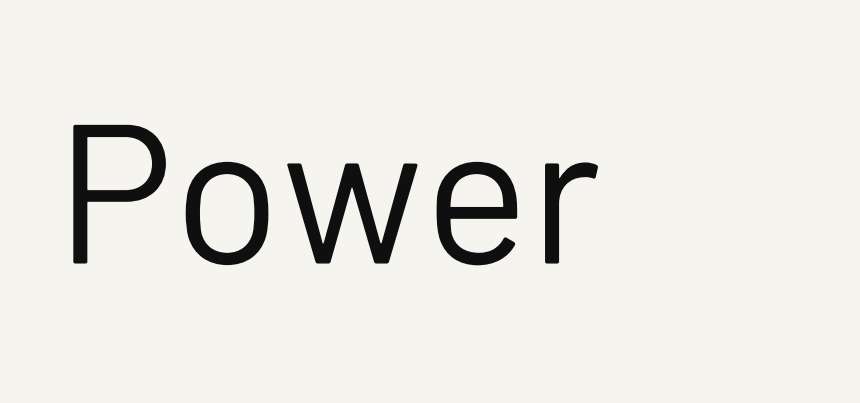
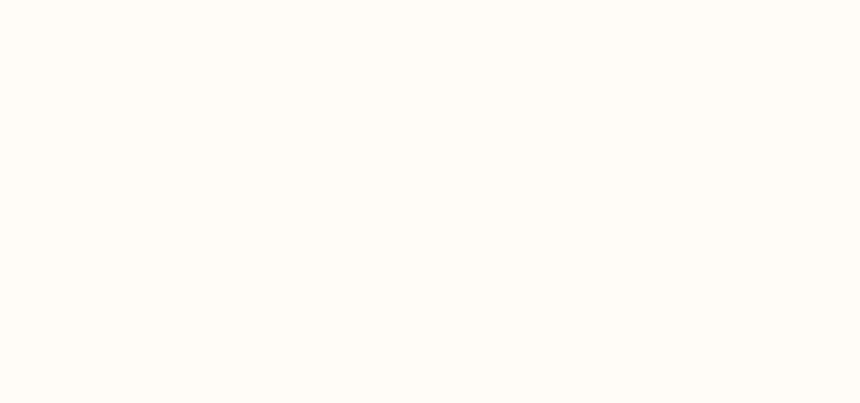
label: Power (335, 195) -> none

